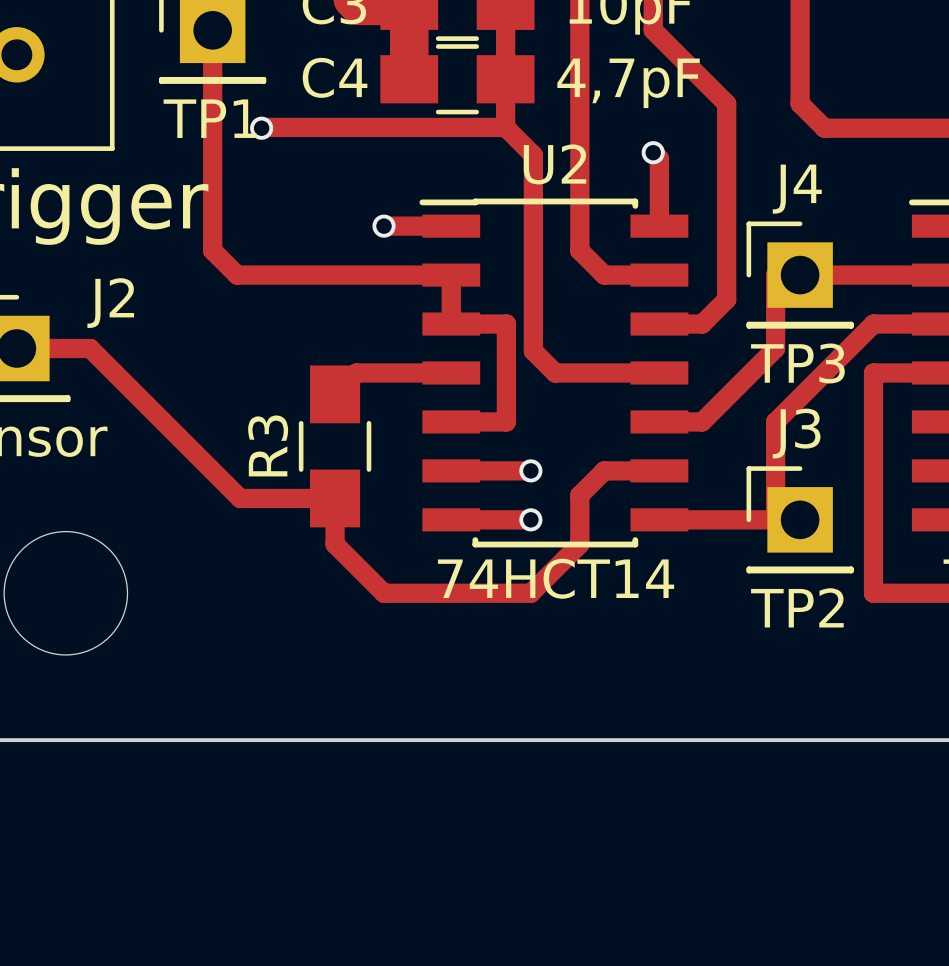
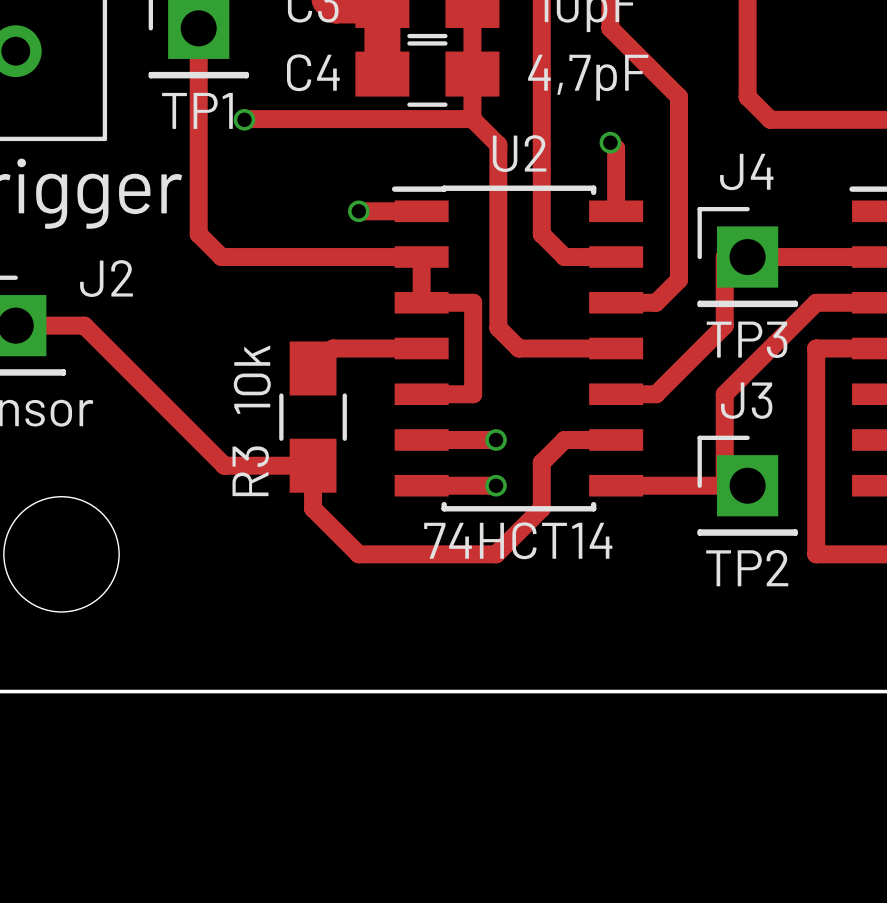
R3 value: none -> 10k (252, 379)
R3 name position: R3 (268, 445) -> R3 (250, 471)

